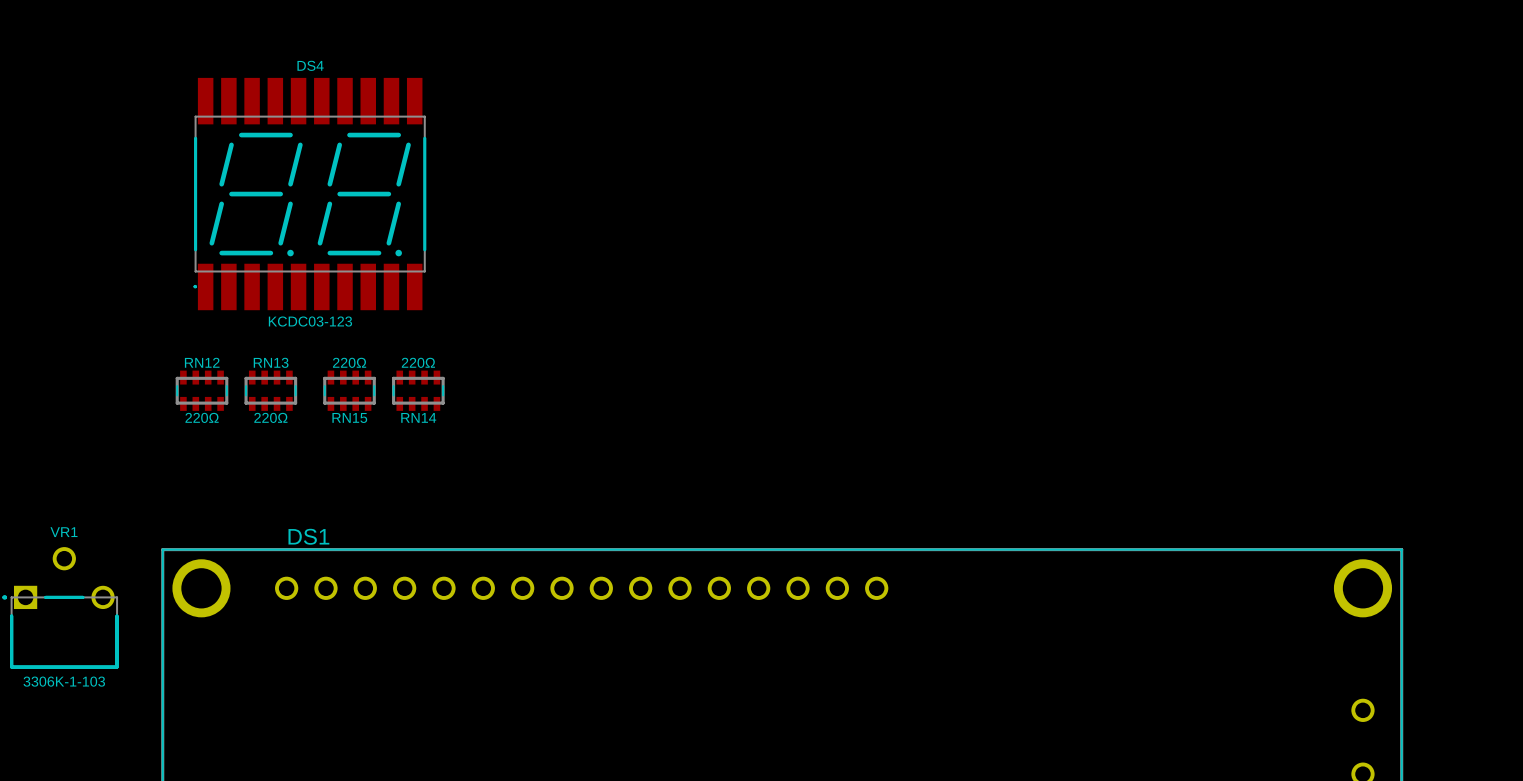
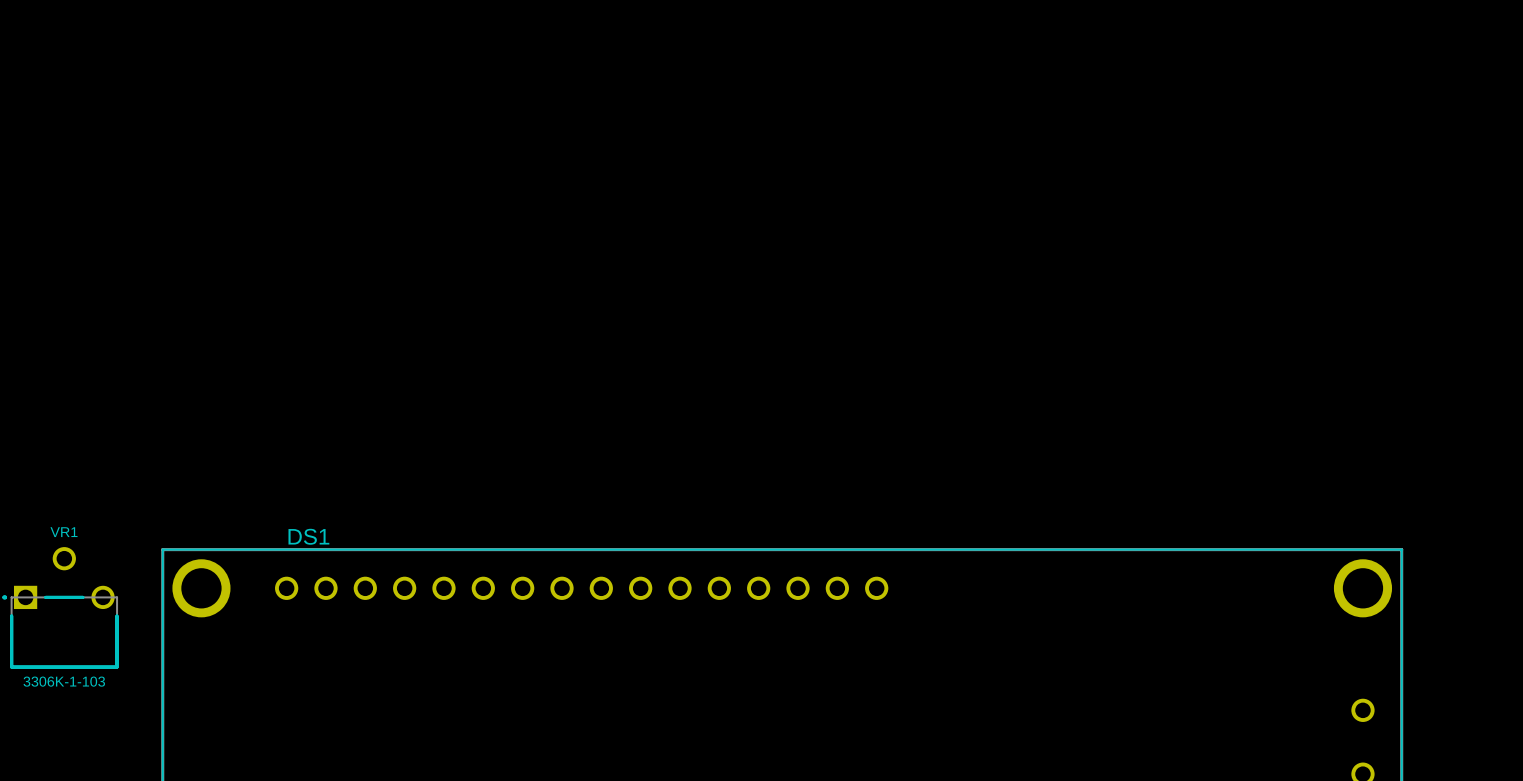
DS4: KCDC03-123 (310, 194) -> none
RN12: (202, 390) -> none
RN13: (270, 390) -> none
RN15: (349, 390) -> none
RN14: (418, 390) -> none

